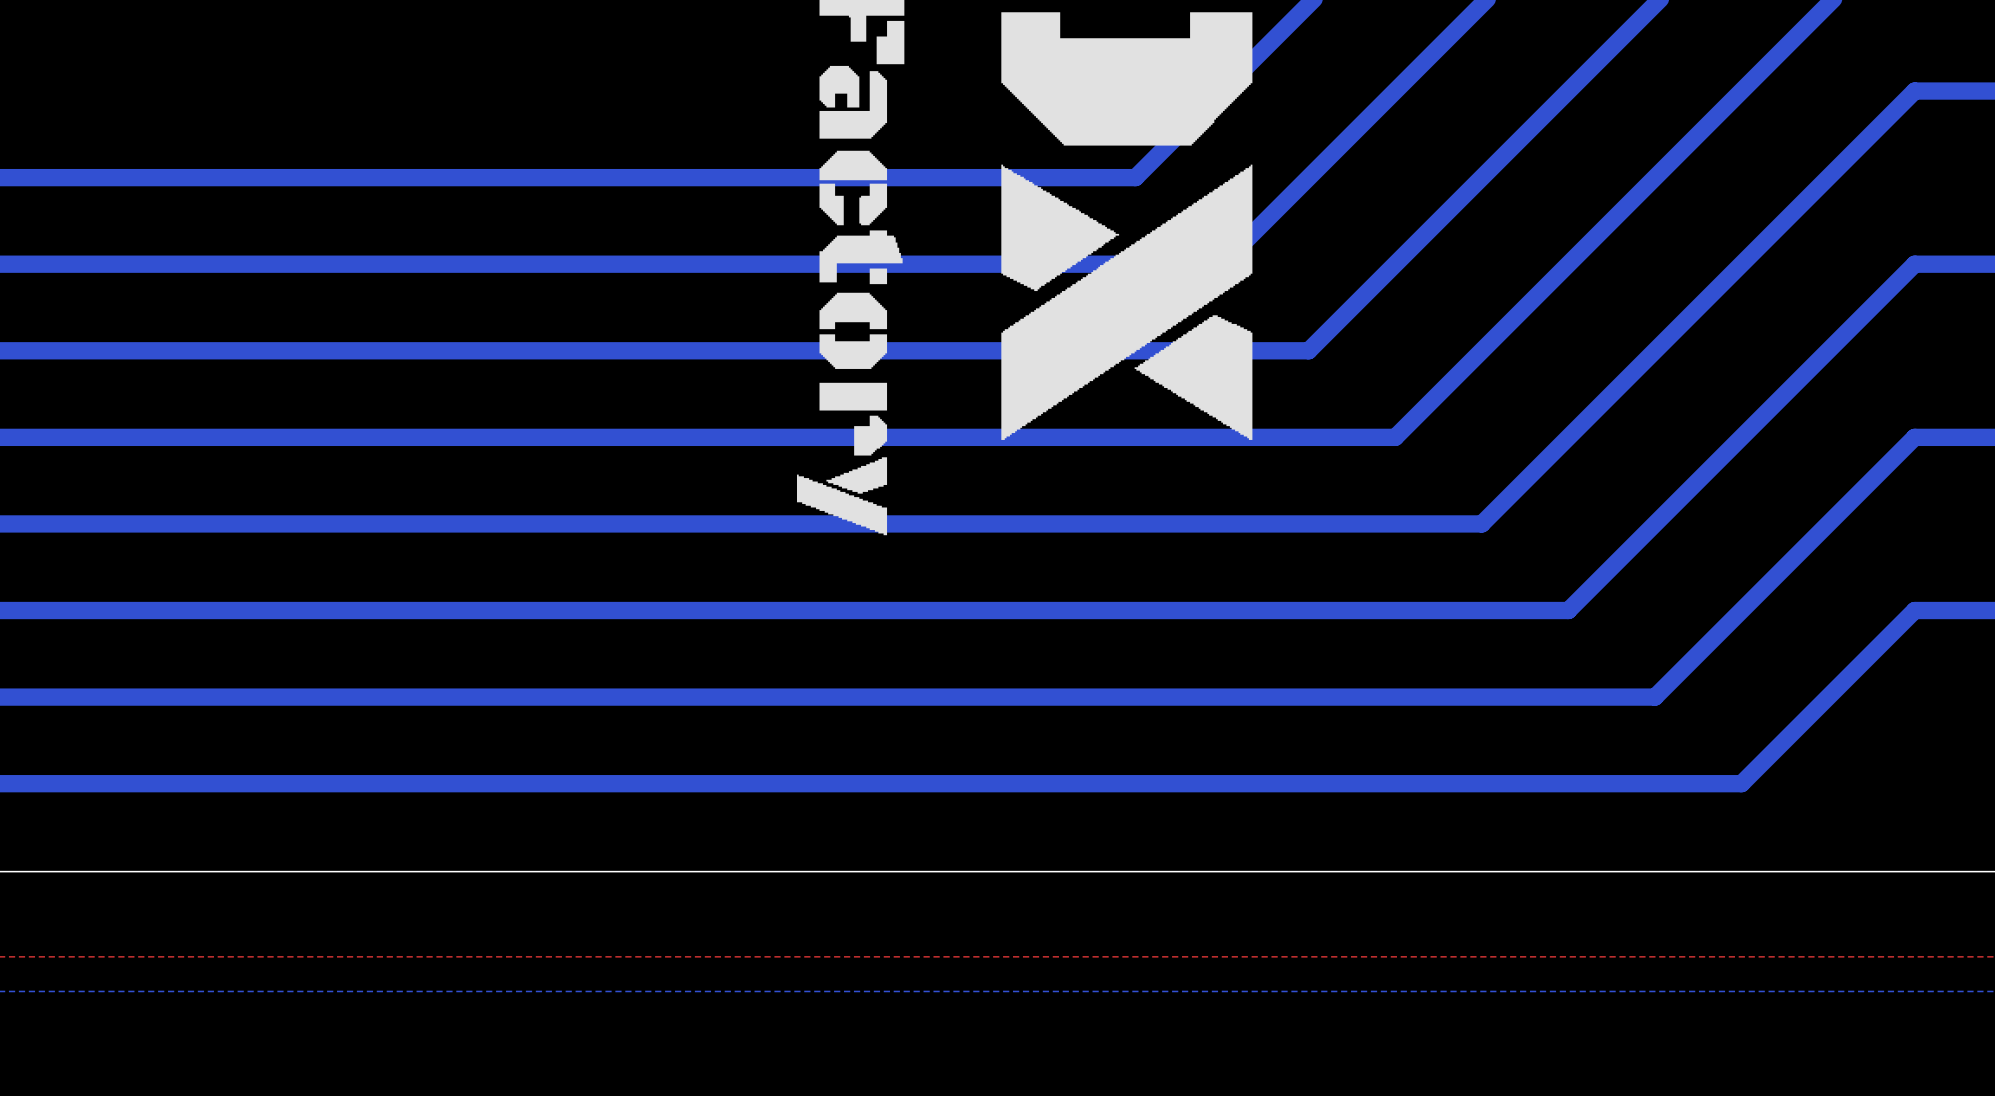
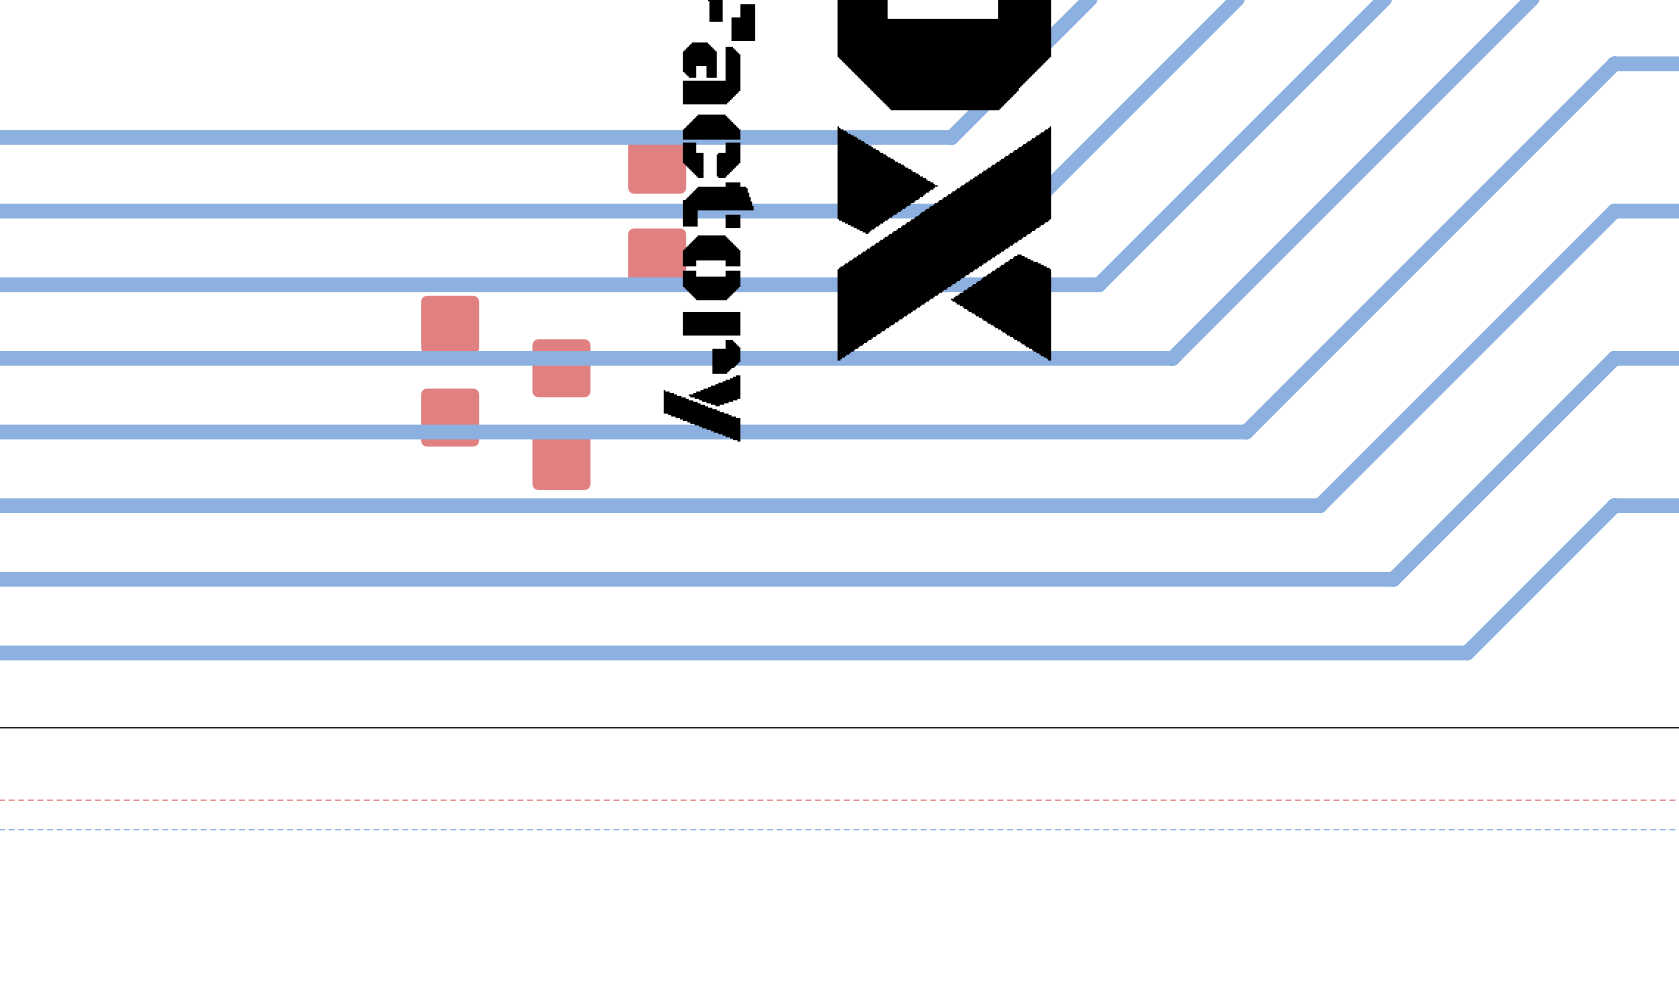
part: none -> (657, 211)
part: none -> (450, 371)
part: none -> (561, 414)

